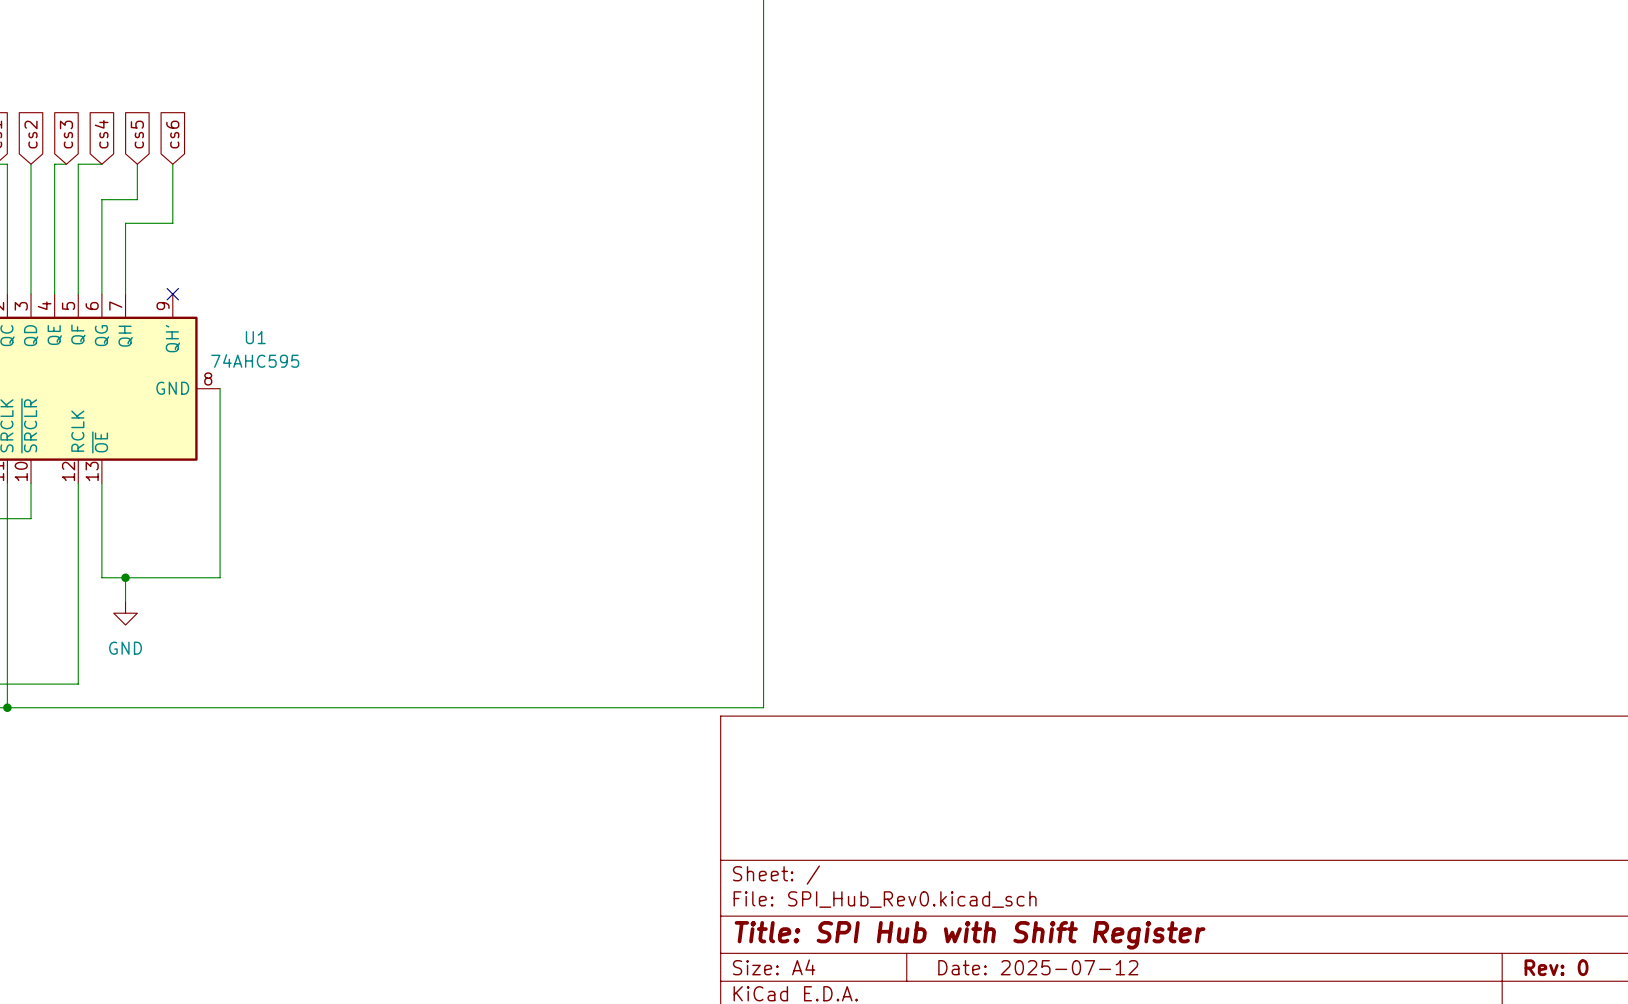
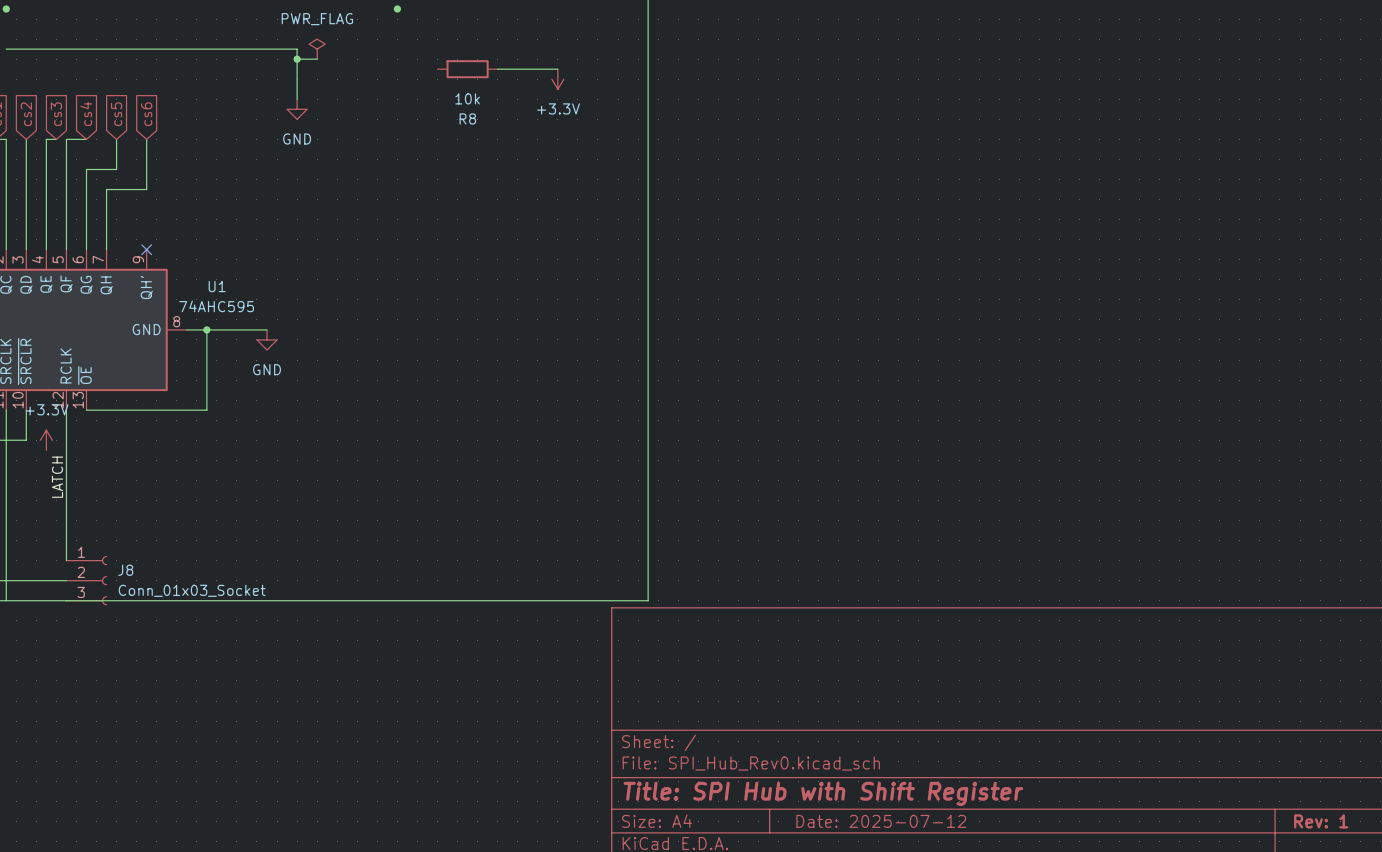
junction: none -> (6, 9)
junction: none -> (397, 9)
wire: none -> (6, 49) (297, 49) (297, 99)
power symbol: none -> PWR_FLAG (317, 49)
wire: none -> (297, 59) (317, 59)
junction: none -> (297, 59)
R8: none -> 10k (467, 69)
wire: none -> (497, 69) (557, 69)
power symbol: none -> +3.3V (557, 79)
power symbol: none -> GND (297, 109)
wire: (220, 388) (220, 577) (101, 577) (101, 483) -> (206, 329) (206, 410) (86, 410)
wire: none -> (186, 329) (267, 329)
junction: none -> (206, 329)
power symbol: none -> GND (267, 339)
power symbol: none -> +3.3V (46, 440)
label: none -> LATCH (57, 477)
wire: (125, 577) (125, 601) -> none
junction: (125, 577) -> none
power symbol: GND (125, 613) -> none
wire: (78, 660) (78, 684) -> none
J8: none -> Conn_01x03_Socket (86, 580)
junction: (7, 707) -> none
title block: Rev: 0 (1556, 967) -> Rev: 1 (1321, 821)

